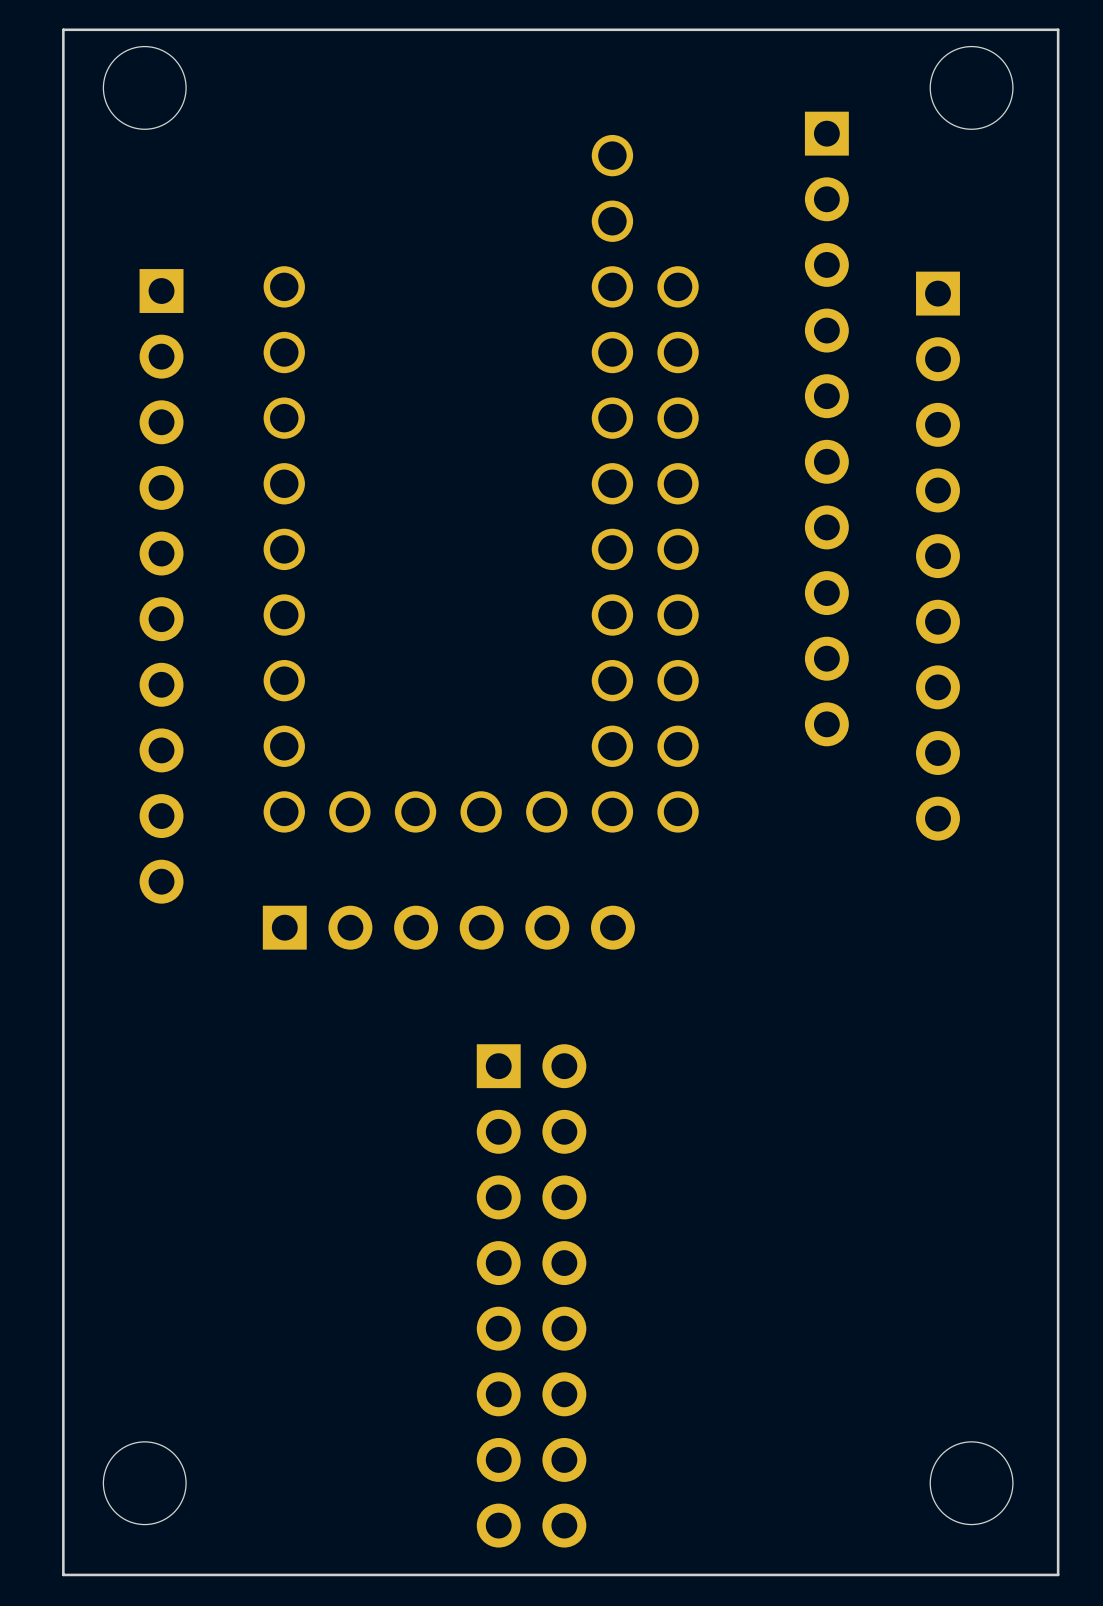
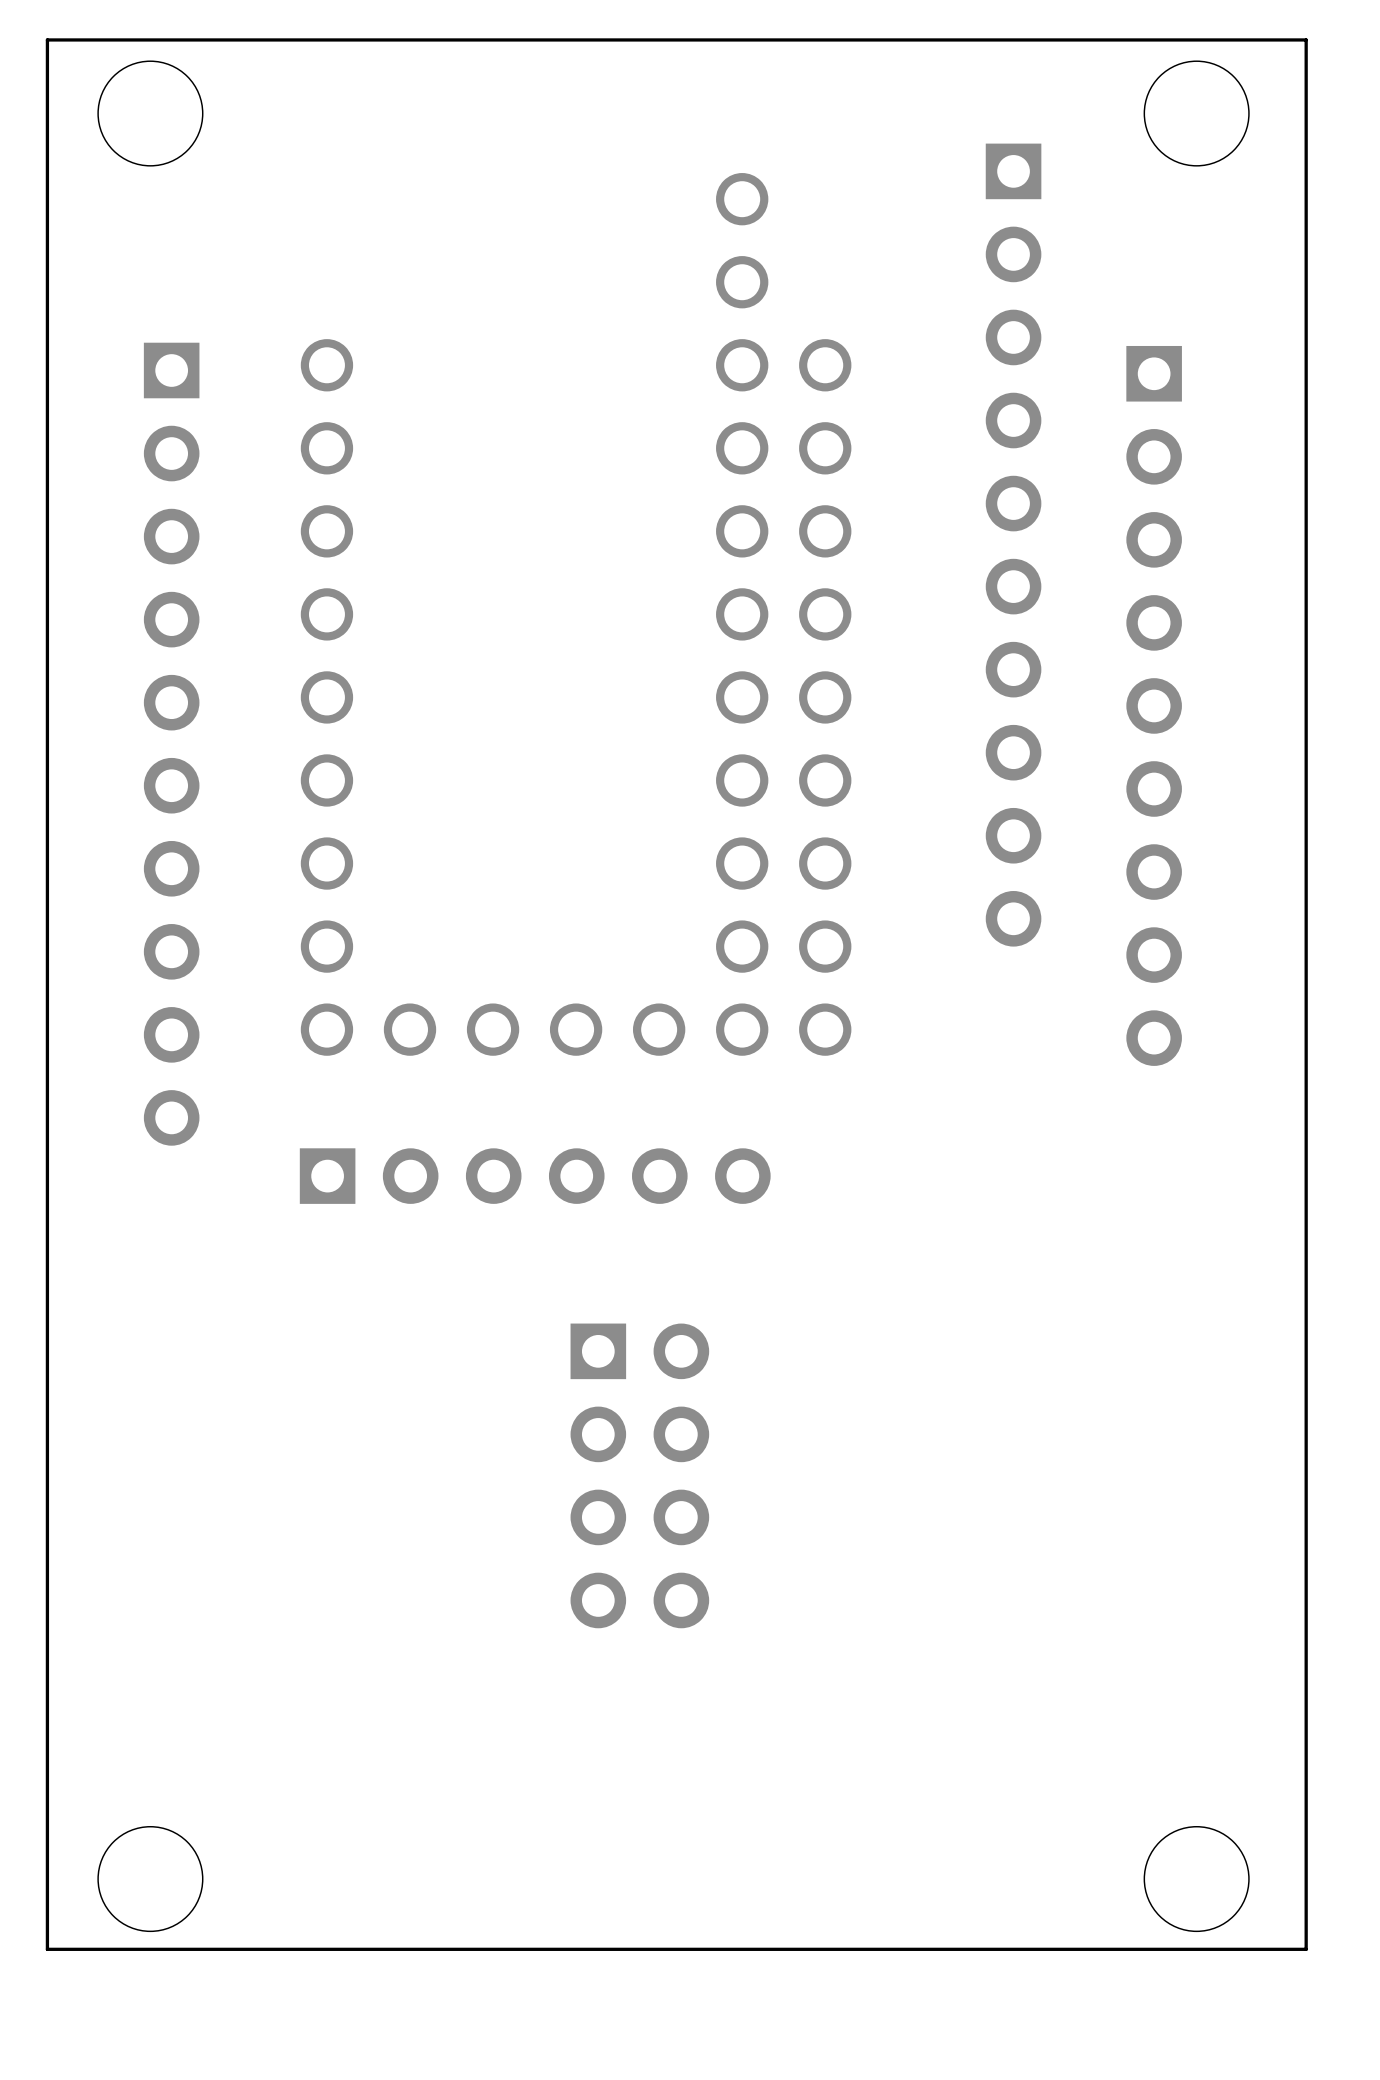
part: (531, 1295) -> none
board edge: (1058, 1538) (1058, 1574) (63, 1574) (63, 1538) -> (1306, 1949) (47, 1949)

